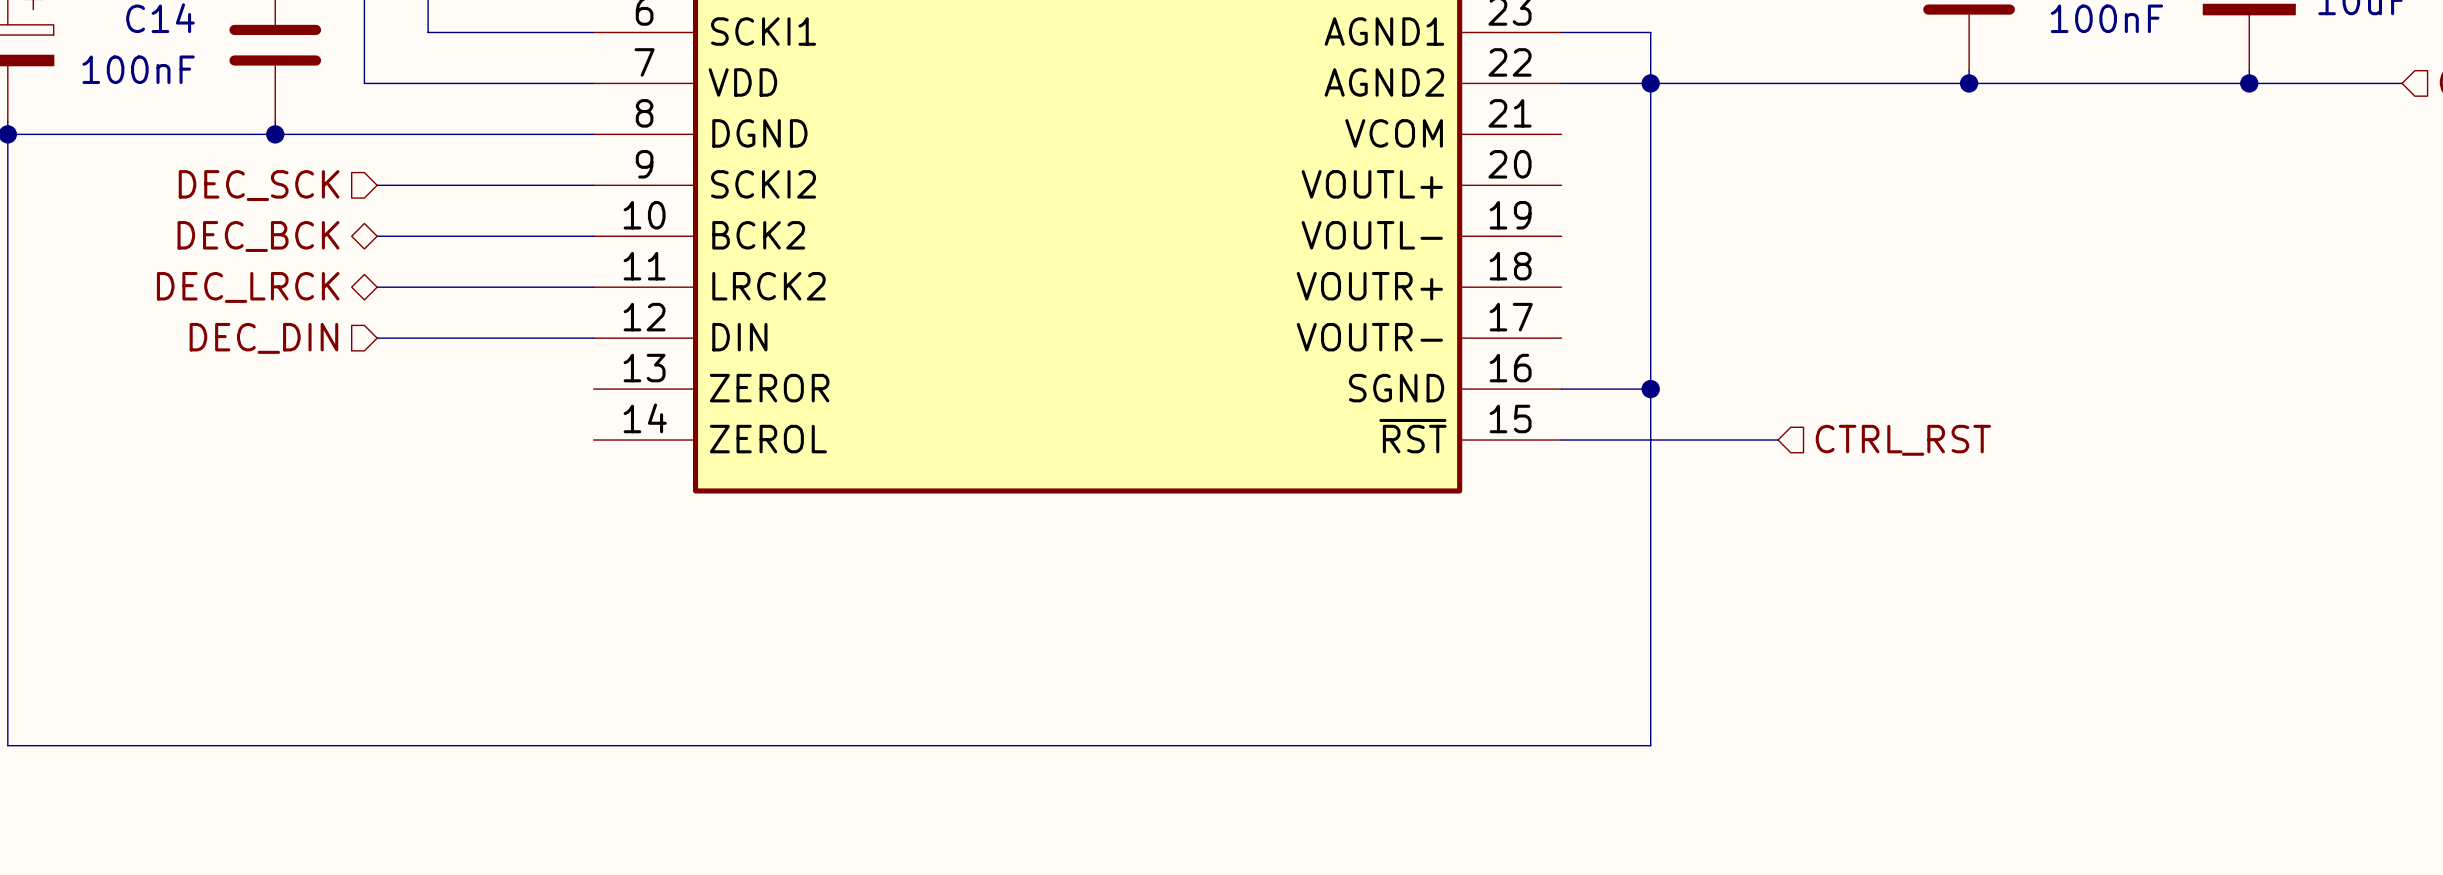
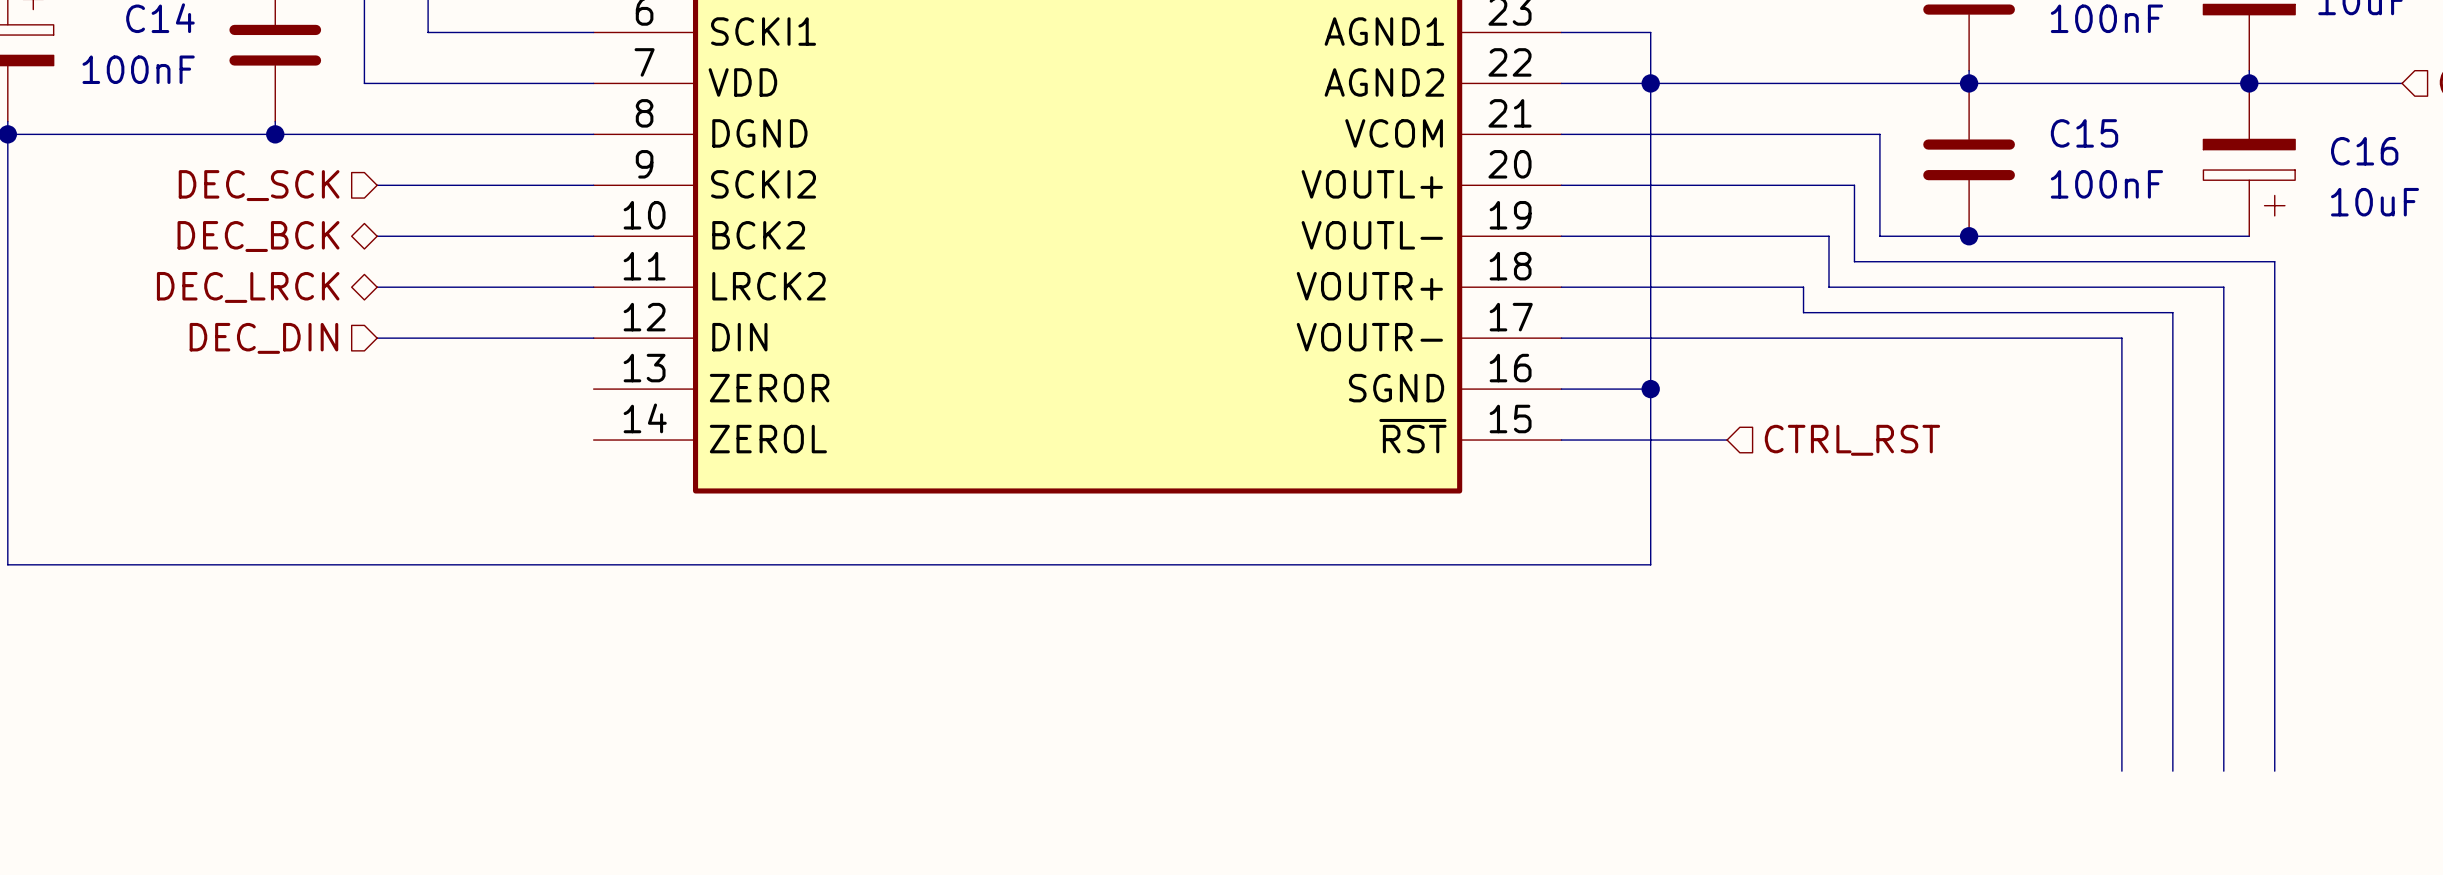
wire: none -> (1561, 134) (1879, 134) (1879, 236) (2249, 236)
C15: none -> 100nF (1969, 159)
C16: none -> 10uF (2249, 159)
wire: none -> (1561, 185) (1854, 185) (1854, 261) (2274, 261) (2274, 771)
wire: none -> (1561, 236) (1829, 236) (1829, 287) (2223, 287) (2223, 771)
junction: none -> (1969, 236)
wire: none -> (1561, 287) (1803, 287) (1803, 312) (2172, 312) (2172, 771)
wire: none -> (1561, 338) (2121, 338) (2121, 771)
wire: (1727, 440) (1778, 440) -> none
hierarchical label position: CTRL_RST (1903, 440) -> CTRL_RST (1852, 440)
wire: (7, 564) (7, 745) (1650, 745) (1650, 564) -> (7, 564) (1650, 564)

